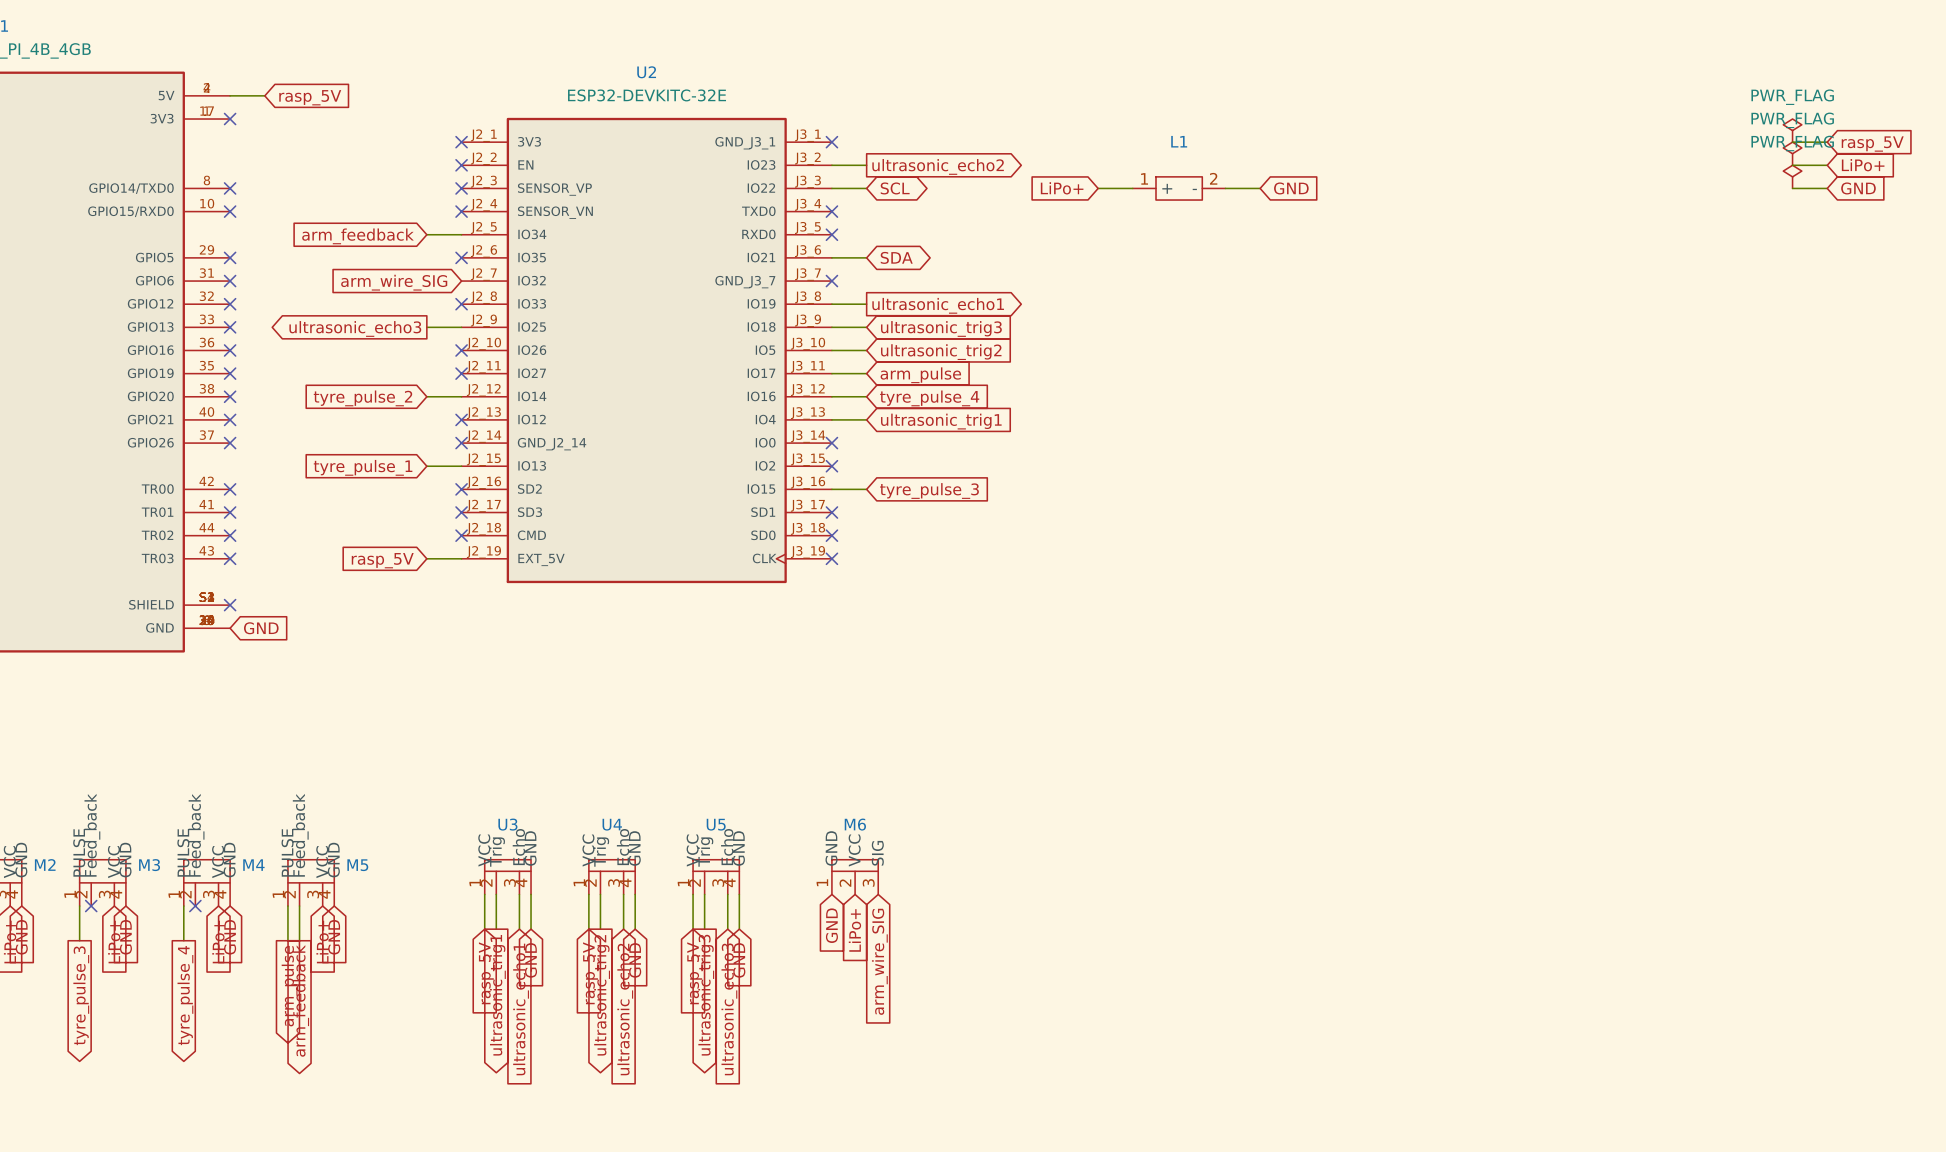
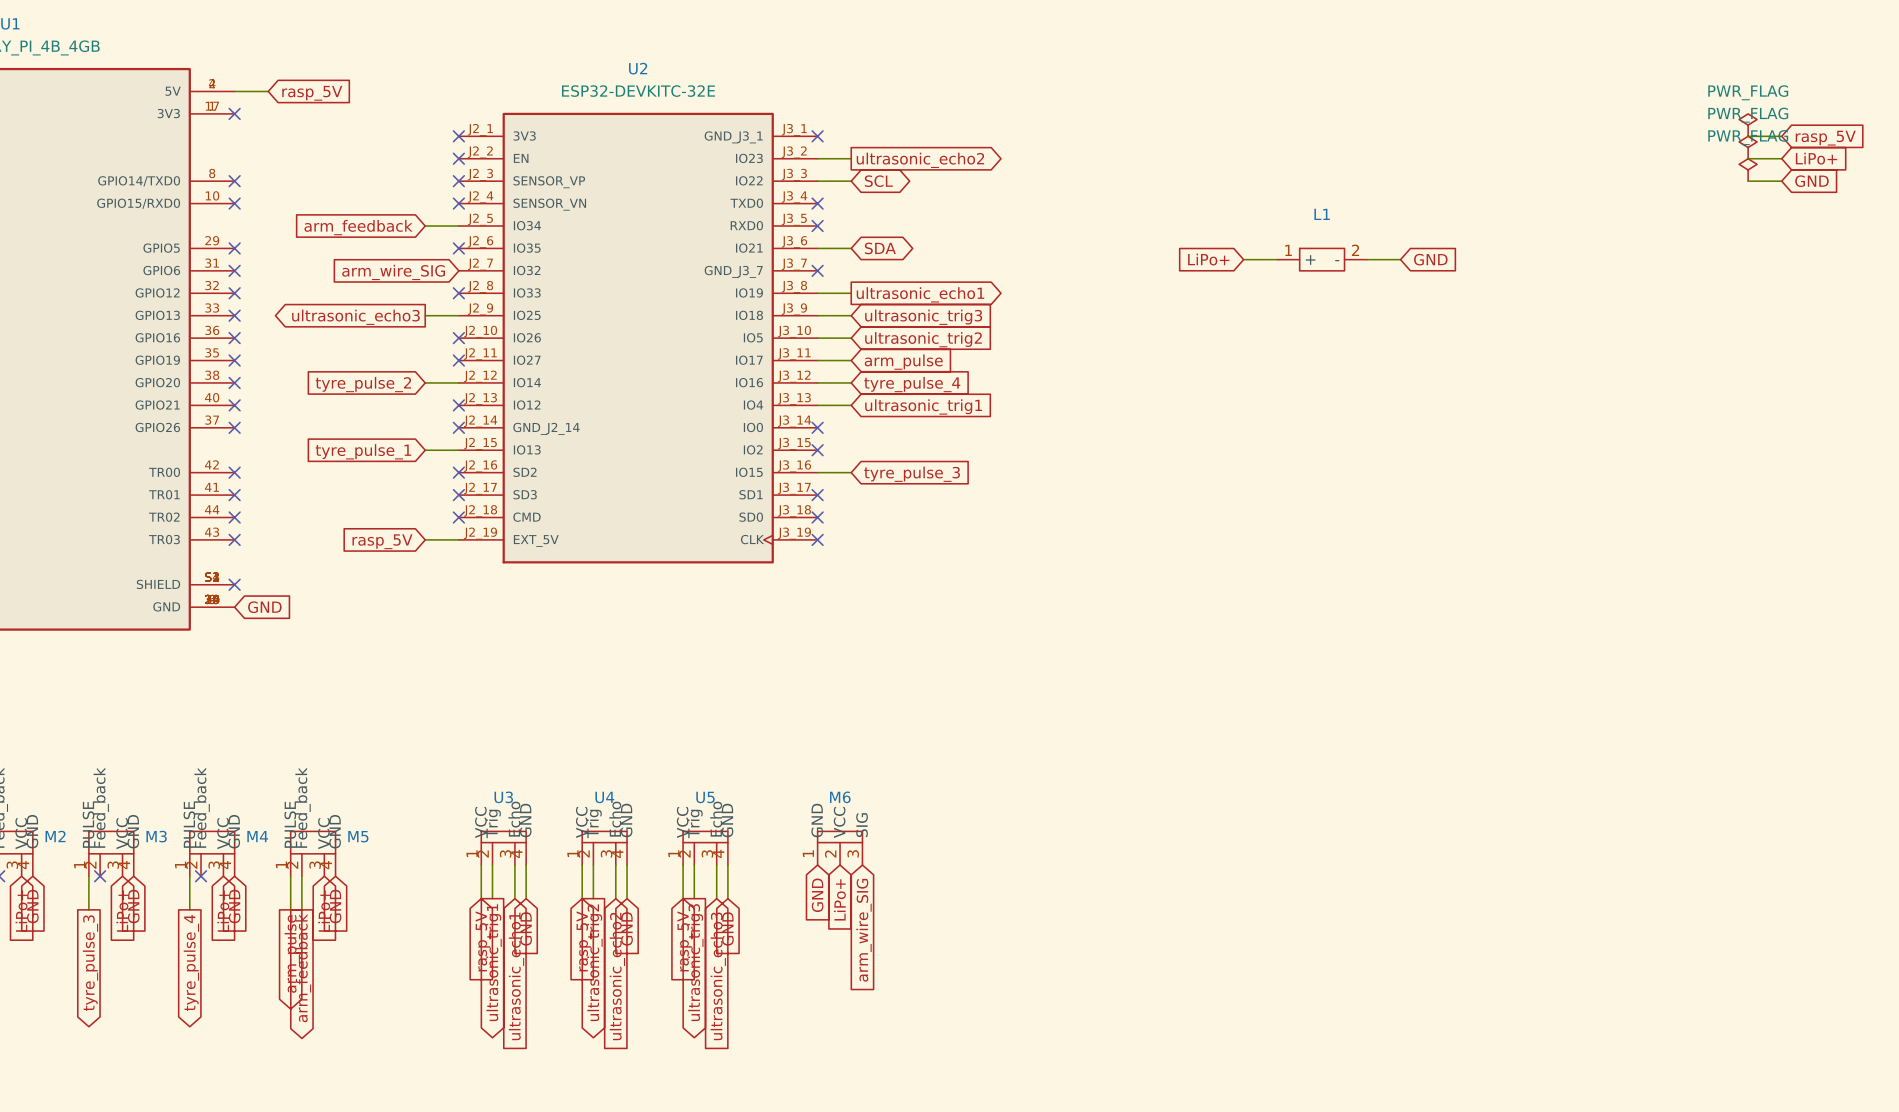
global label position: LiPo+ (1062, 188) -> LiPo+ (1208, 259)
wire: (1098, 188) (1132, 188) -> (1243, 259) (1277, 259)
L1 position: (1179, 188) -> (1322, 259)
wire: (1225, 188) (1260, 188) -> (1366, 259) (1400, 259)
global label position: GND (1291, 188) -> GND (1430, 259)

